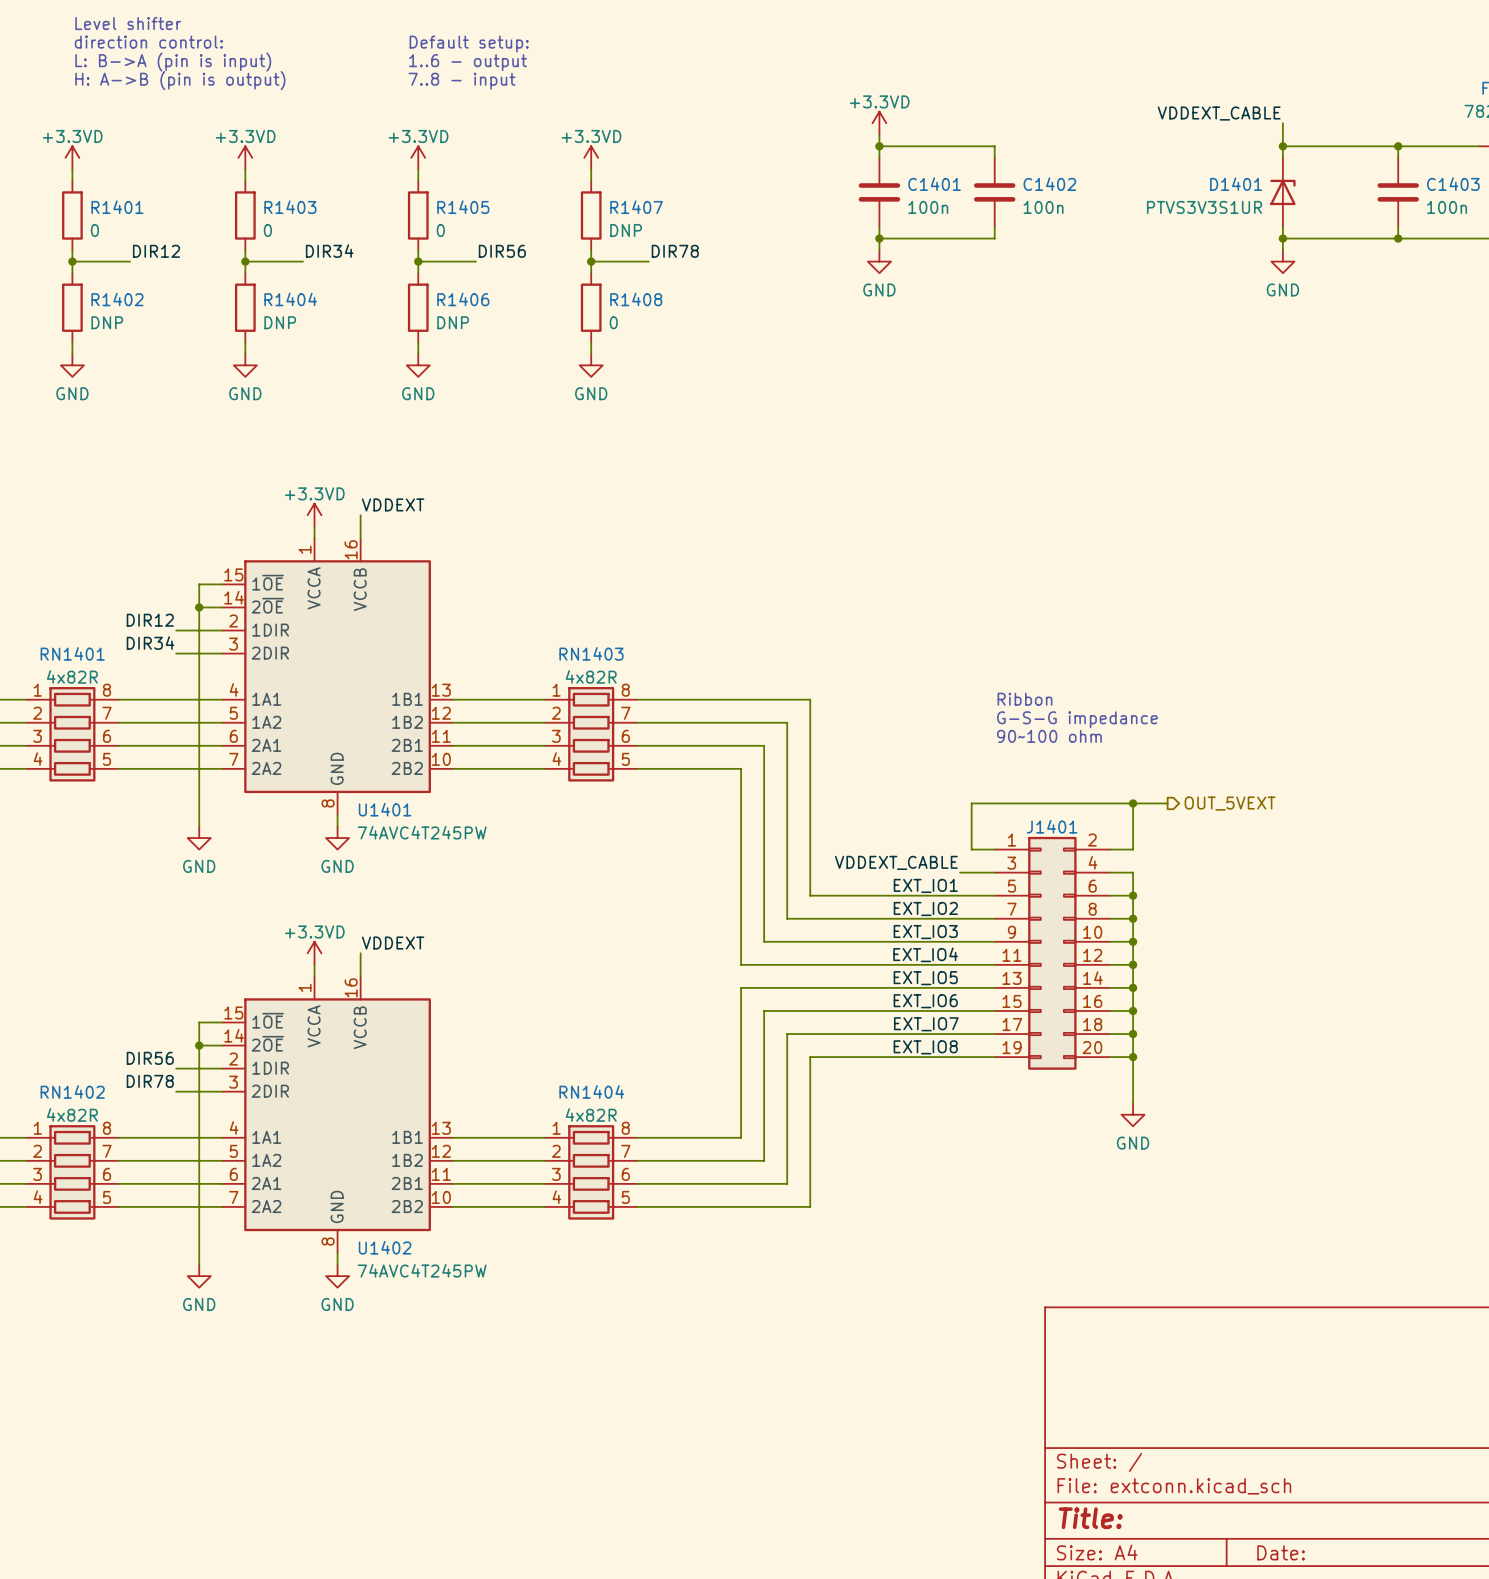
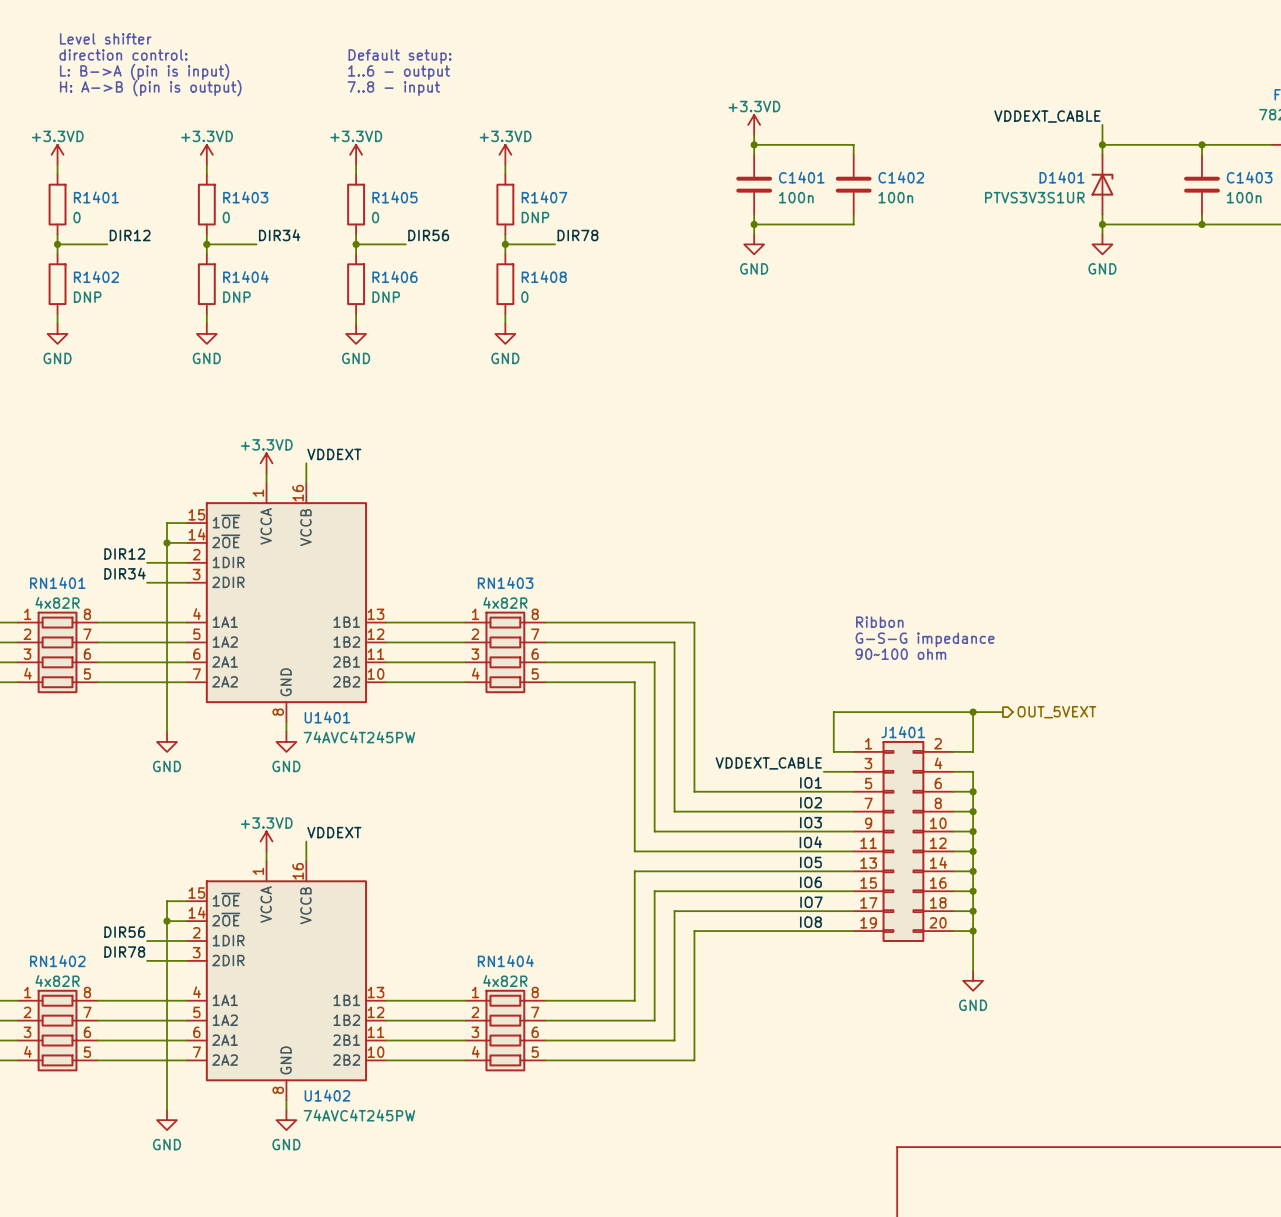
label: EXT_IO1 (925, 885) -> IO1 (811, 782)
label: EXT_IO2 (925, 909) -> IO2 (811, 802)
label: EXT_IO3 (925, 932) -> IO3 (810, 822)
label: EXT_IO4 (925, 954) -> IO4 (810, 842)
label: EXT_IO5 (925, 978) -> IO5 (810, 862)
label: EXT_IO6 (925, 1001) -> IO6 (810, 882)
label: EXT_IO7 (926, 1024) -> IO7 (811, 902)
label: EXT_IO8 (925, 1047) -> IO8 (810, 922)

